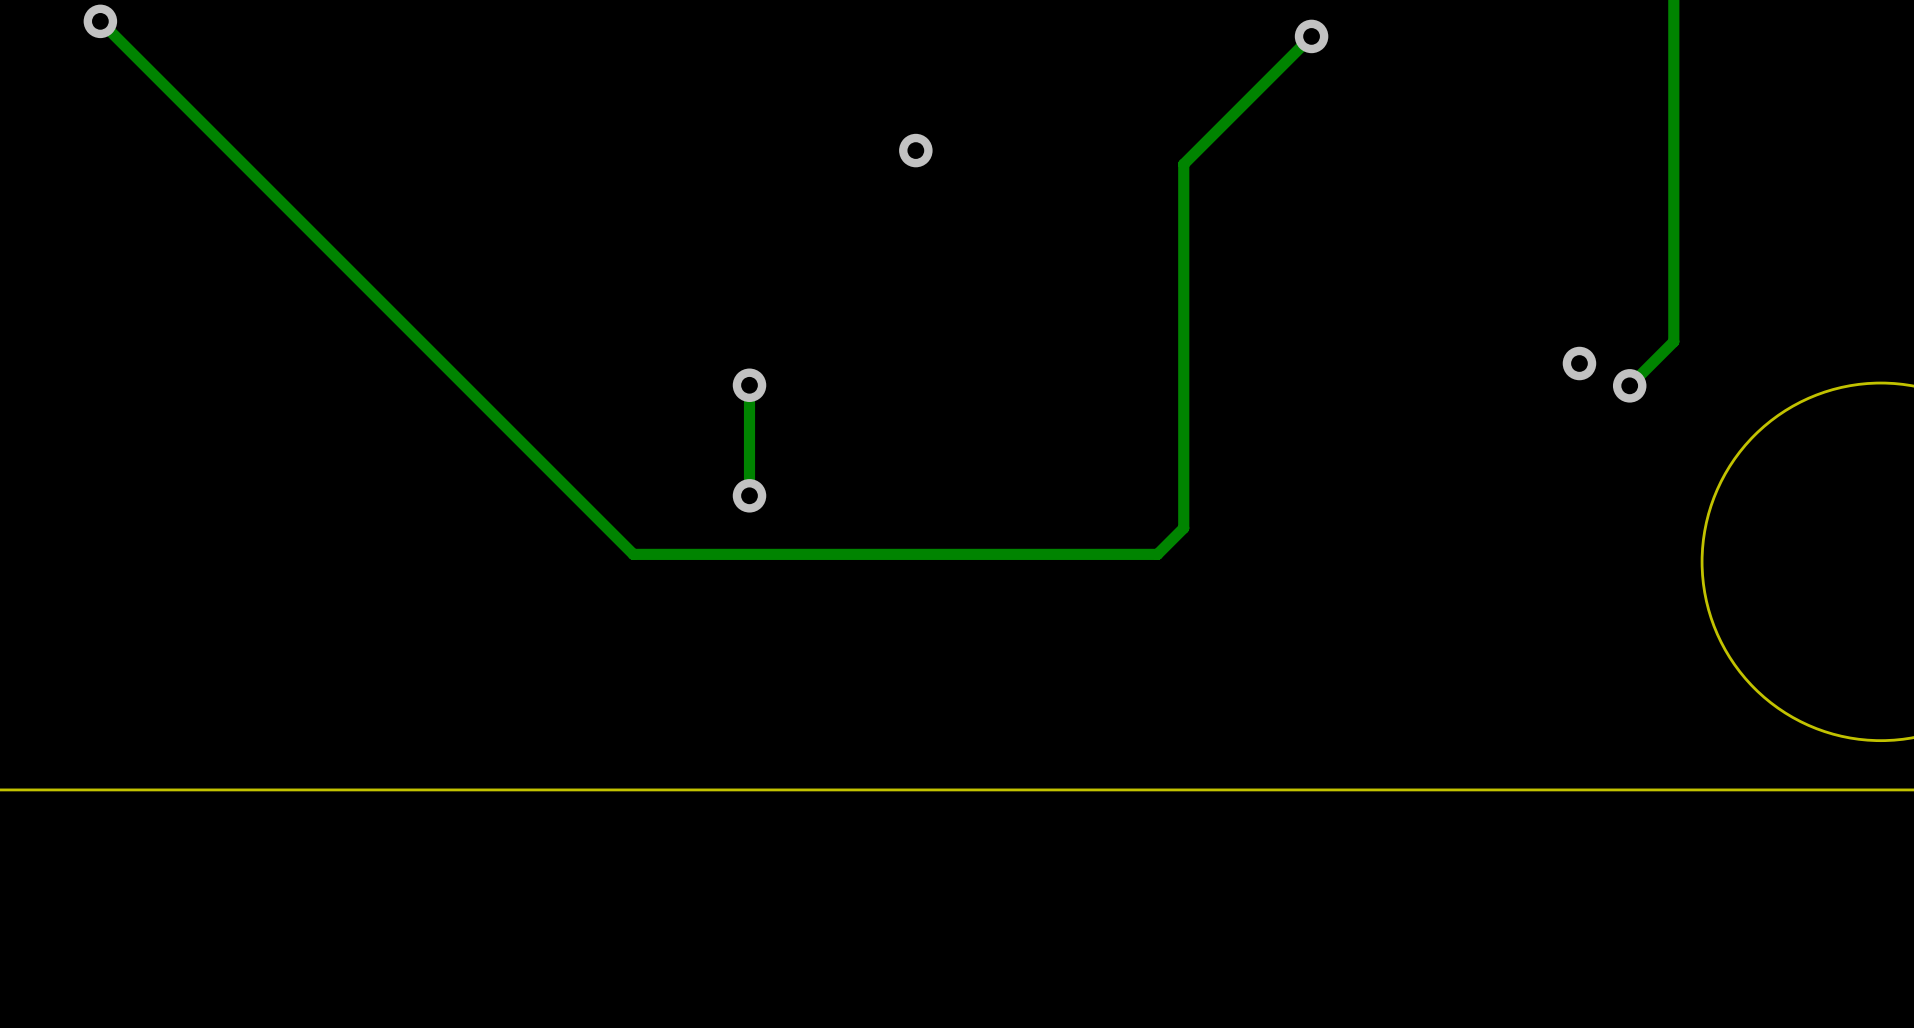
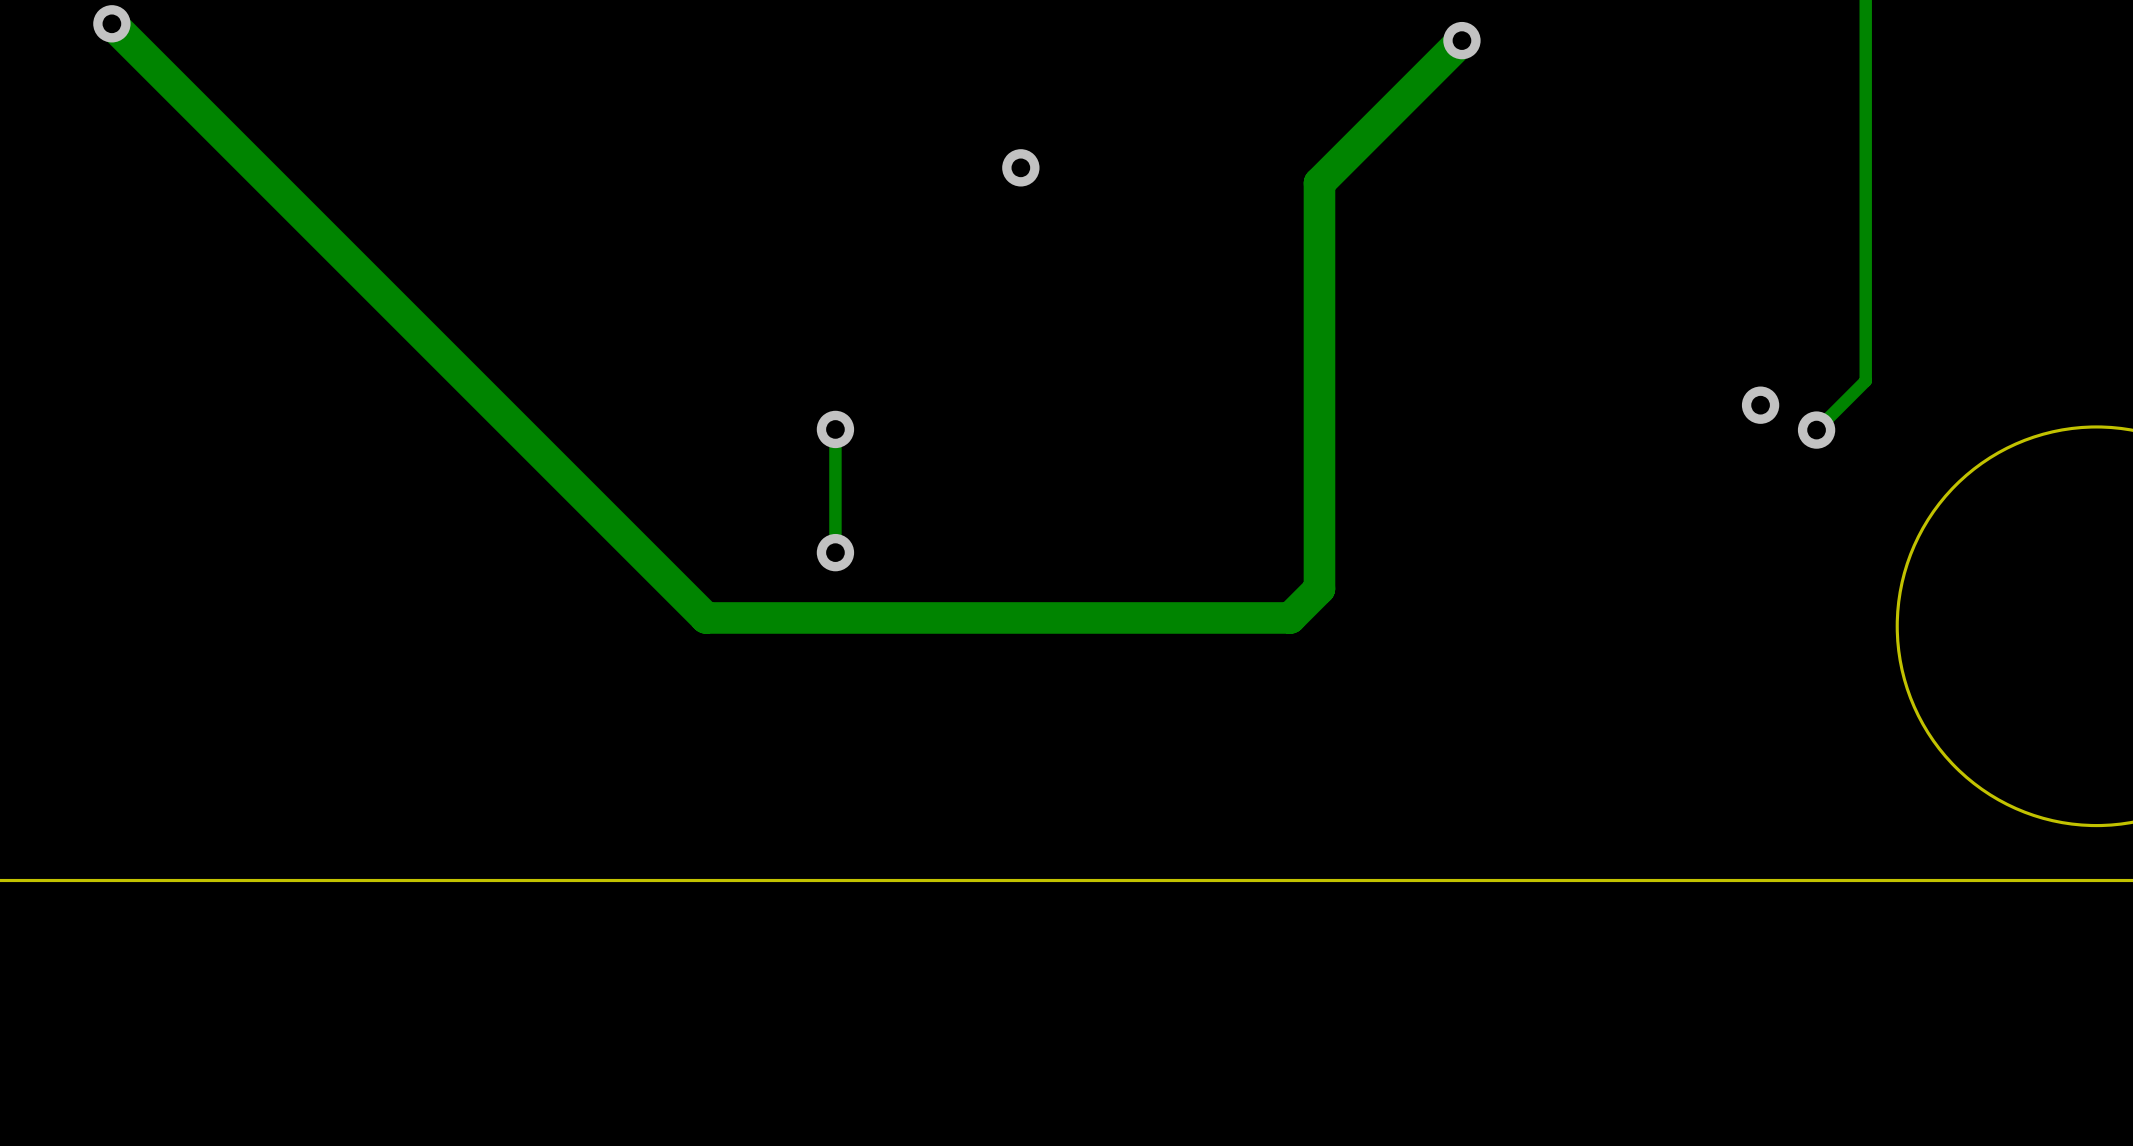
track width: thin (100, 21) (633, 554) (1157, 554) (1183, 528) (1183, 164) (1311, 36) -> thick (111, 23) (706, 617) (1290, 617) (1319, 588) (1319, 183) (1461, 40)

